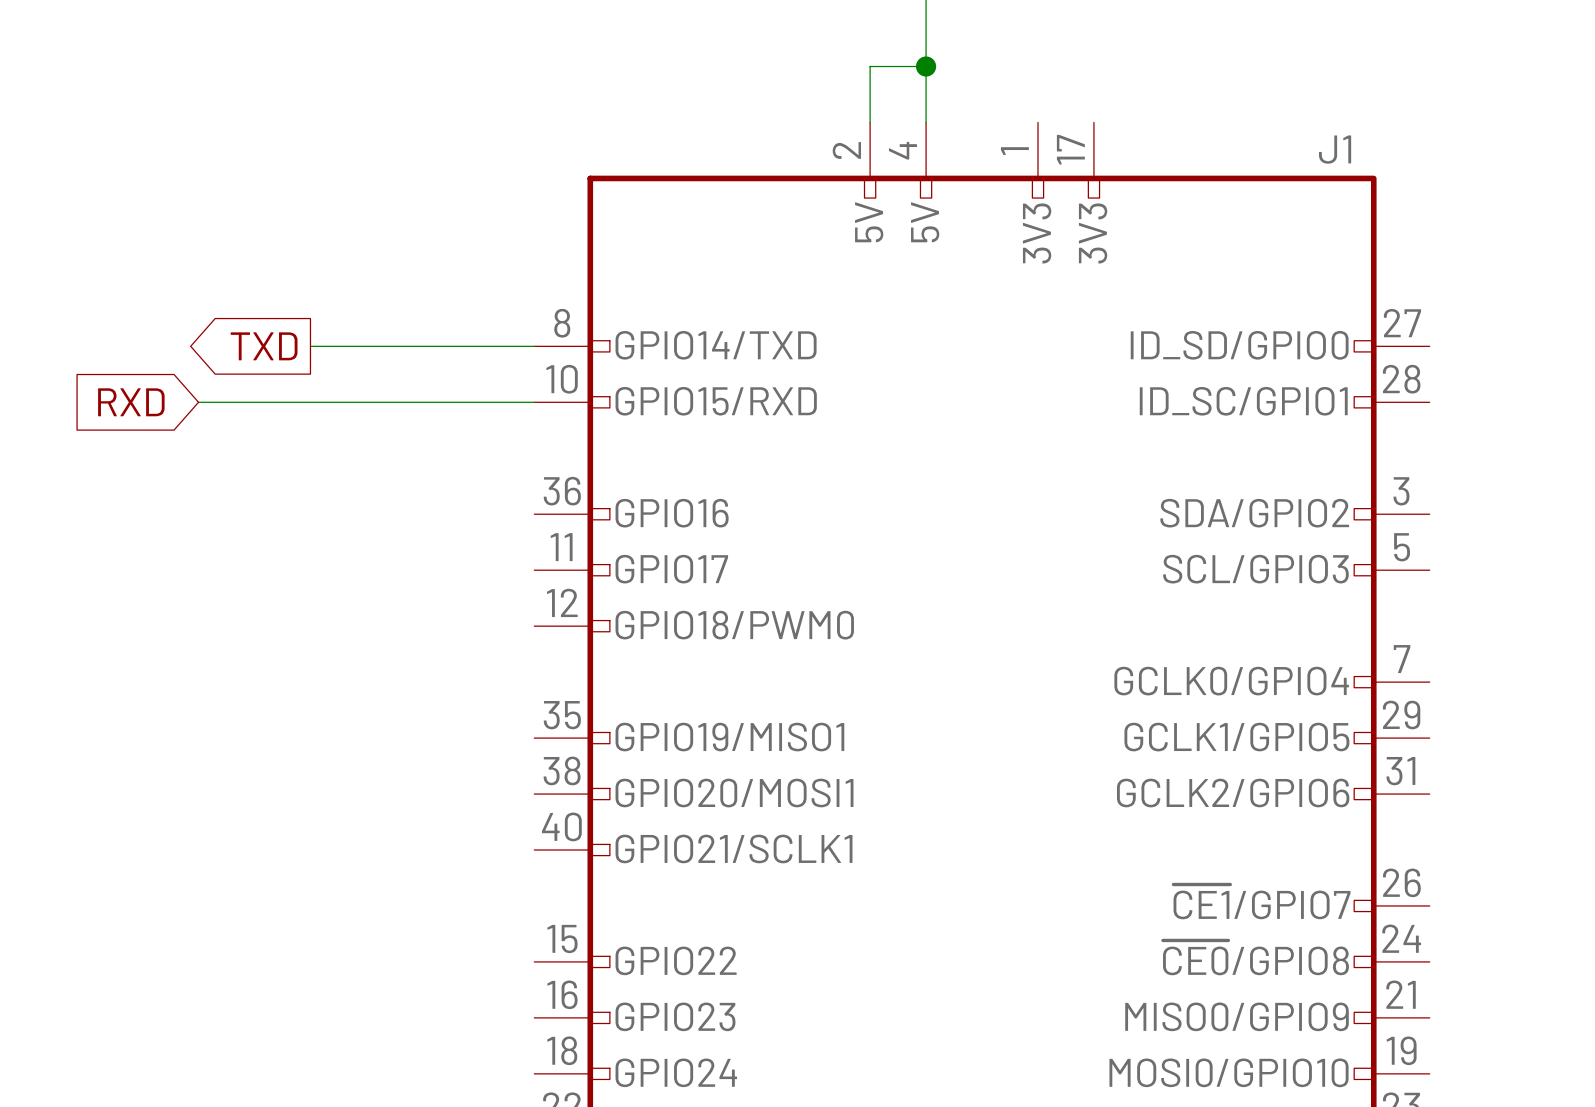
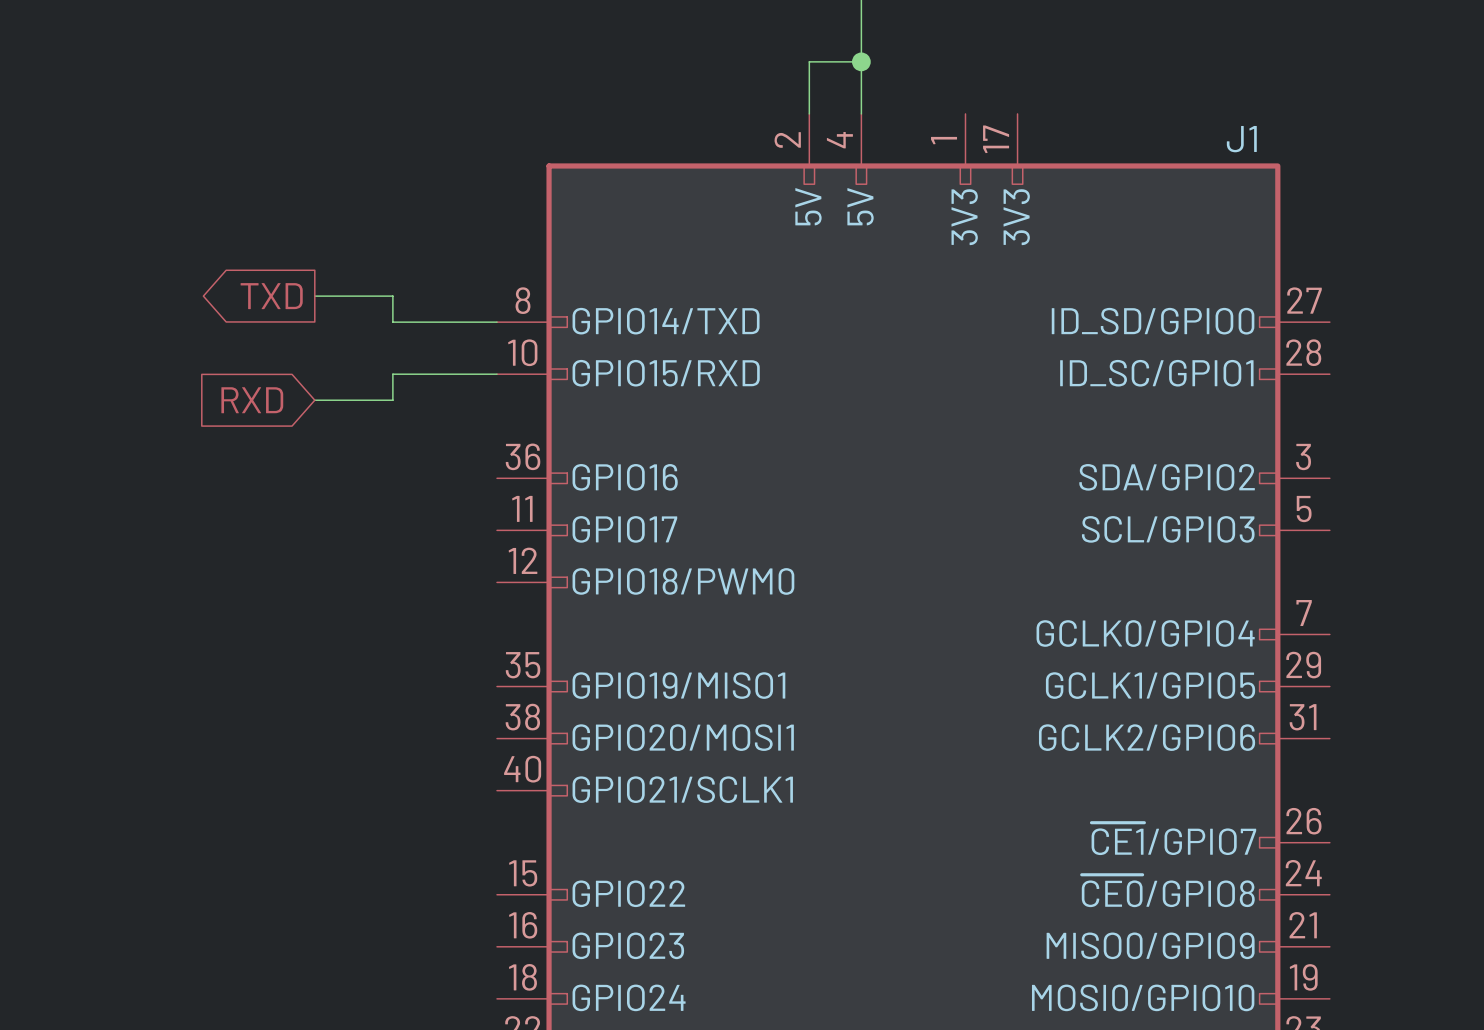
global label position: TXD (264, 346) -> TXD (271, 296)
wire: (310, 346) (422, 346) -> (314, 296) (392, 296) (392, 322)
global label position: RXD (131, 402) -> RXD (252, 400)
wire: (198, 402) (422, 402) -> (314, 400) (392, 400) (392, 374)

